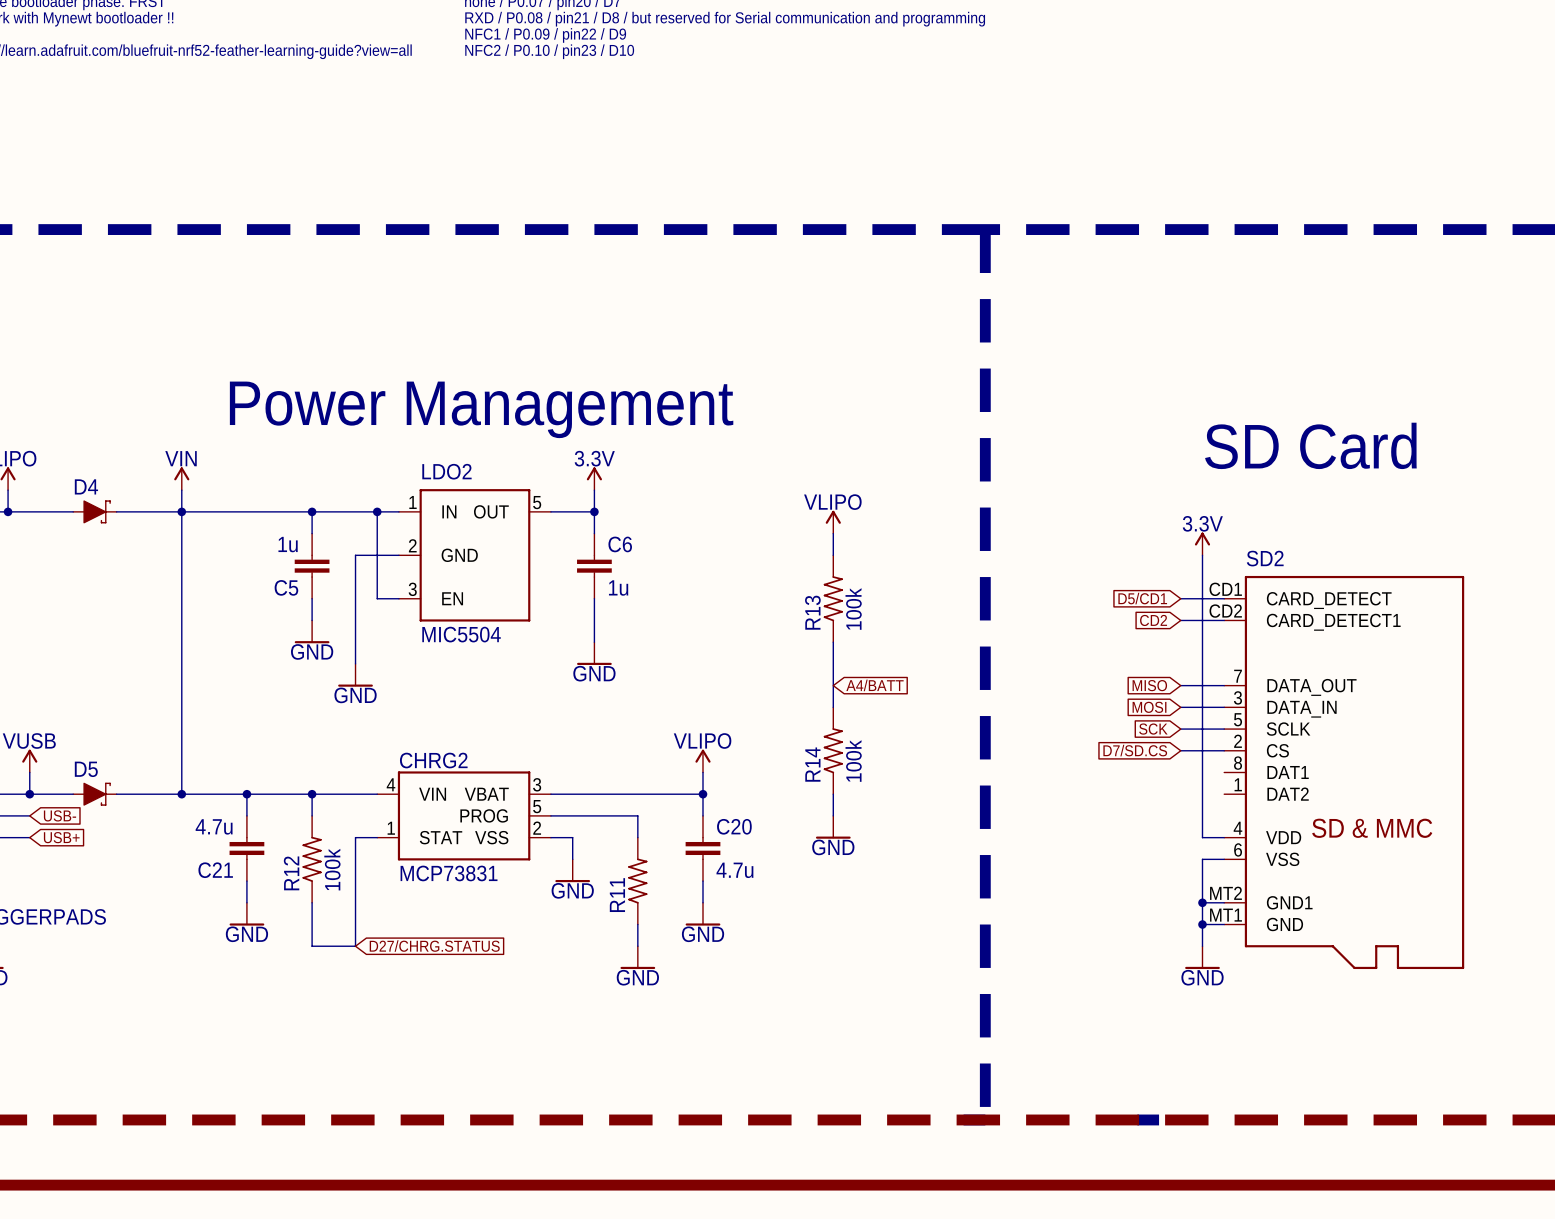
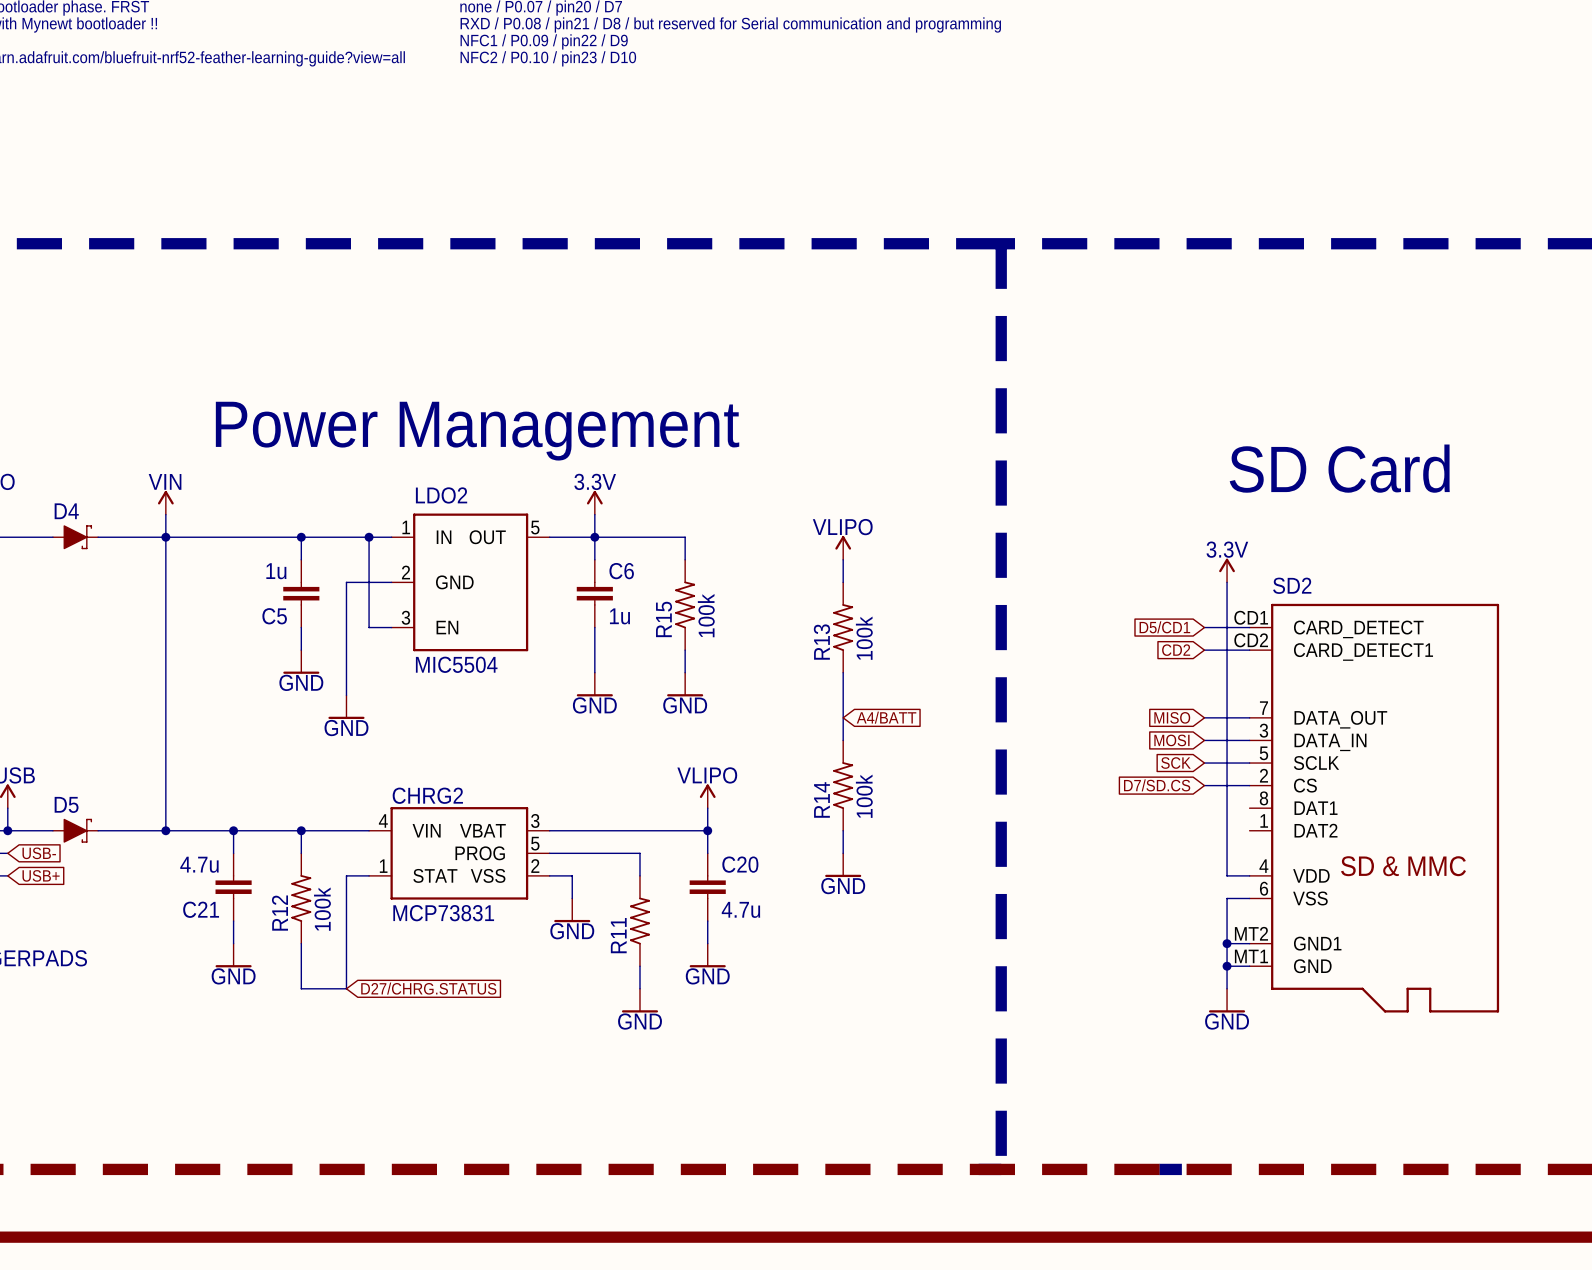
wire: none -> (594, 537) (685, 537) (685, 559)
R15: none -> 100k (685, 604)
wire: none -> (685, 650) (685, 672)
power symbol: none -> GND (685, 684)

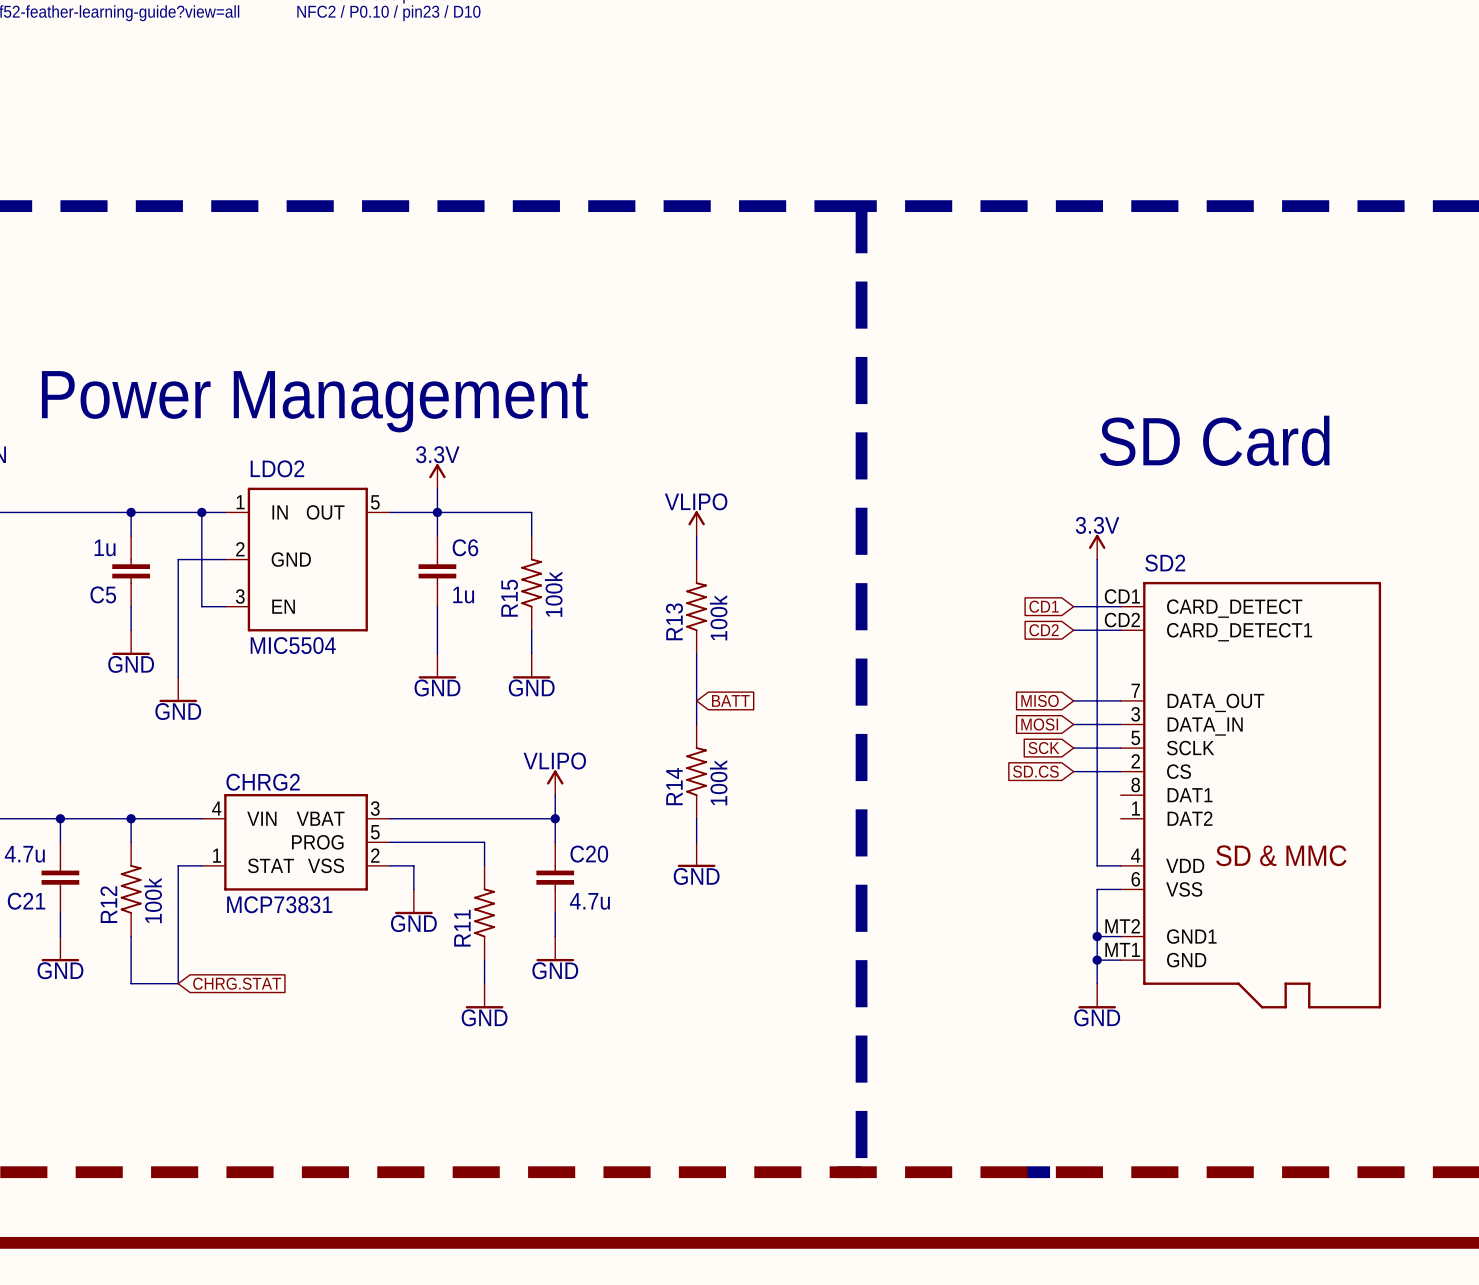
global label: D5/CD1 (1164, 627) -> CD1 (1044, 606)
global label: A4/BATT (886, 717) -> BATT (730, 700)
global label: D7/SD.CS (1157, 785) -> SD.CS (1035, 771)
global label: D27/CHRG.STATUS (428, 988) -> CHRG.STAT (237, 983)

